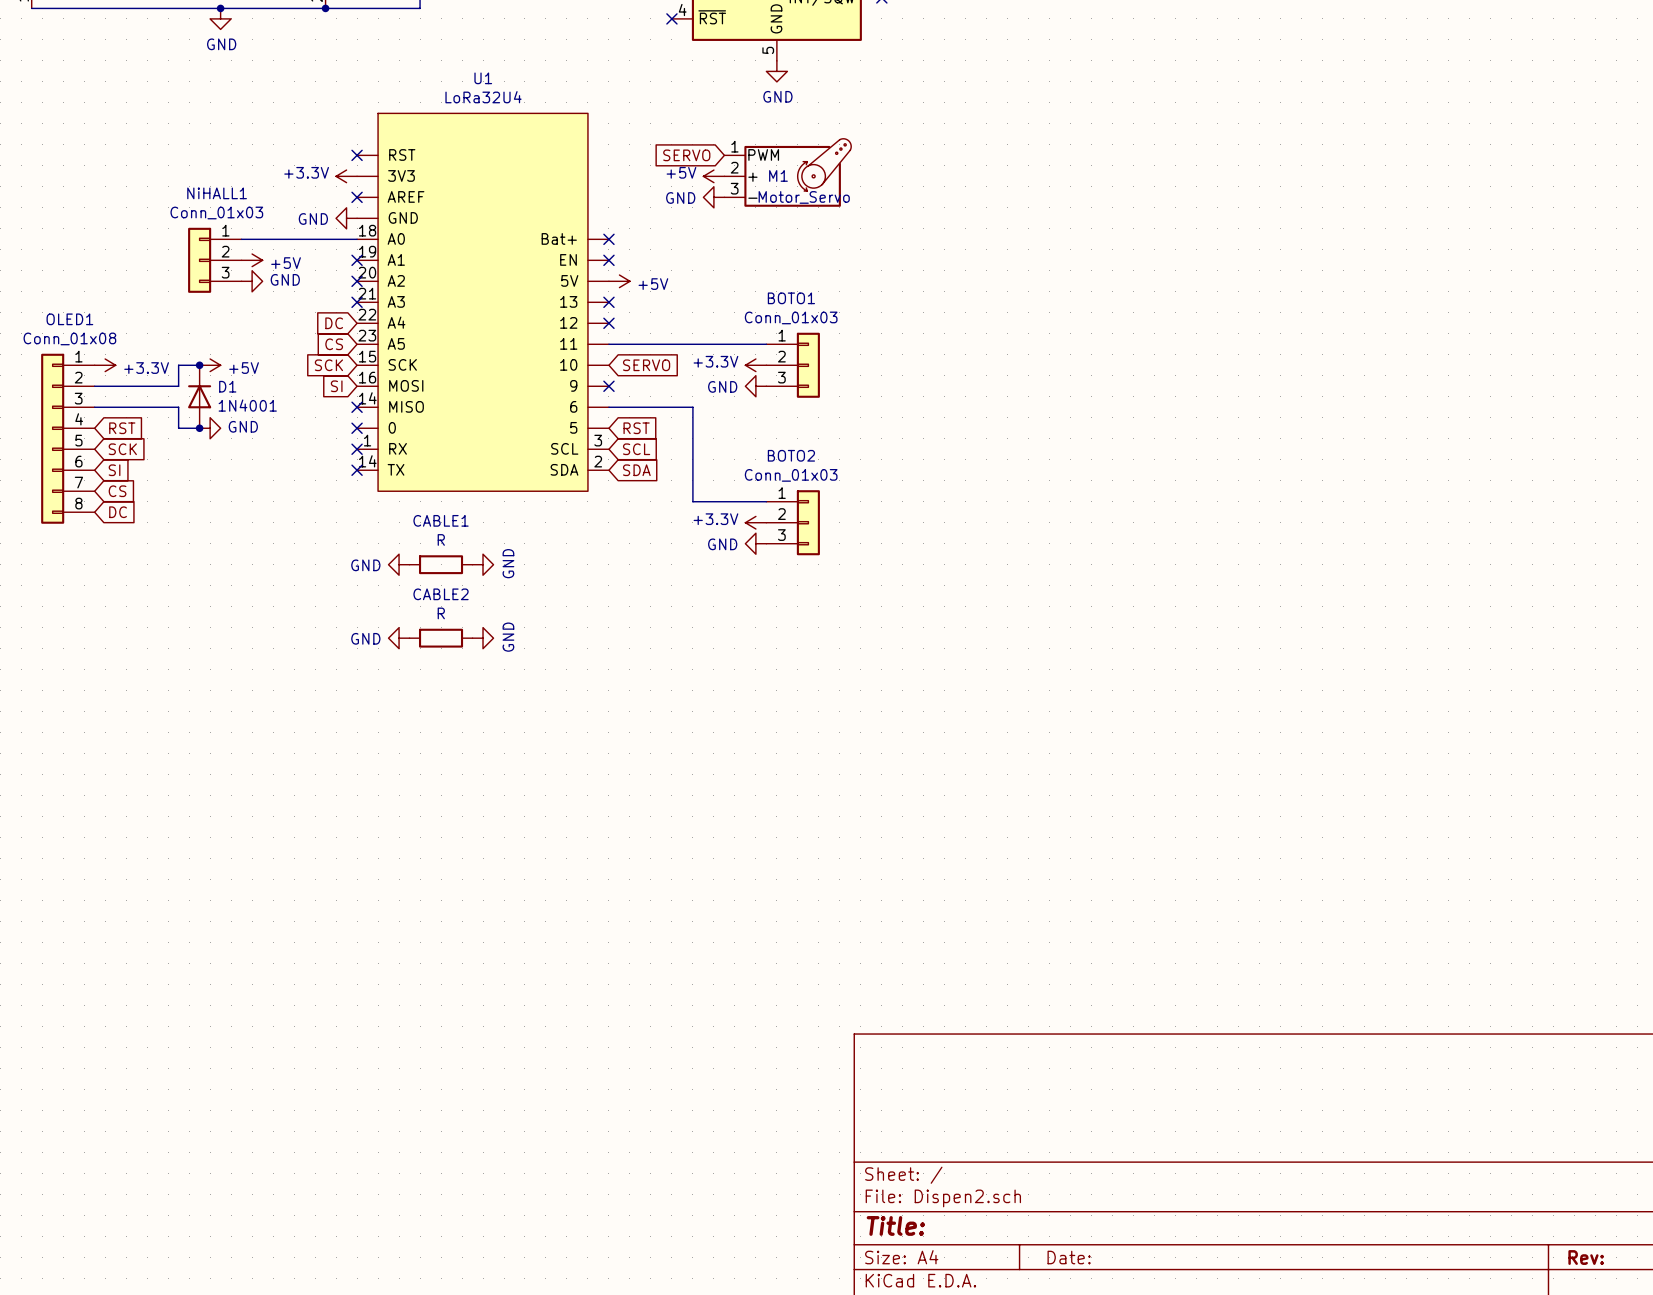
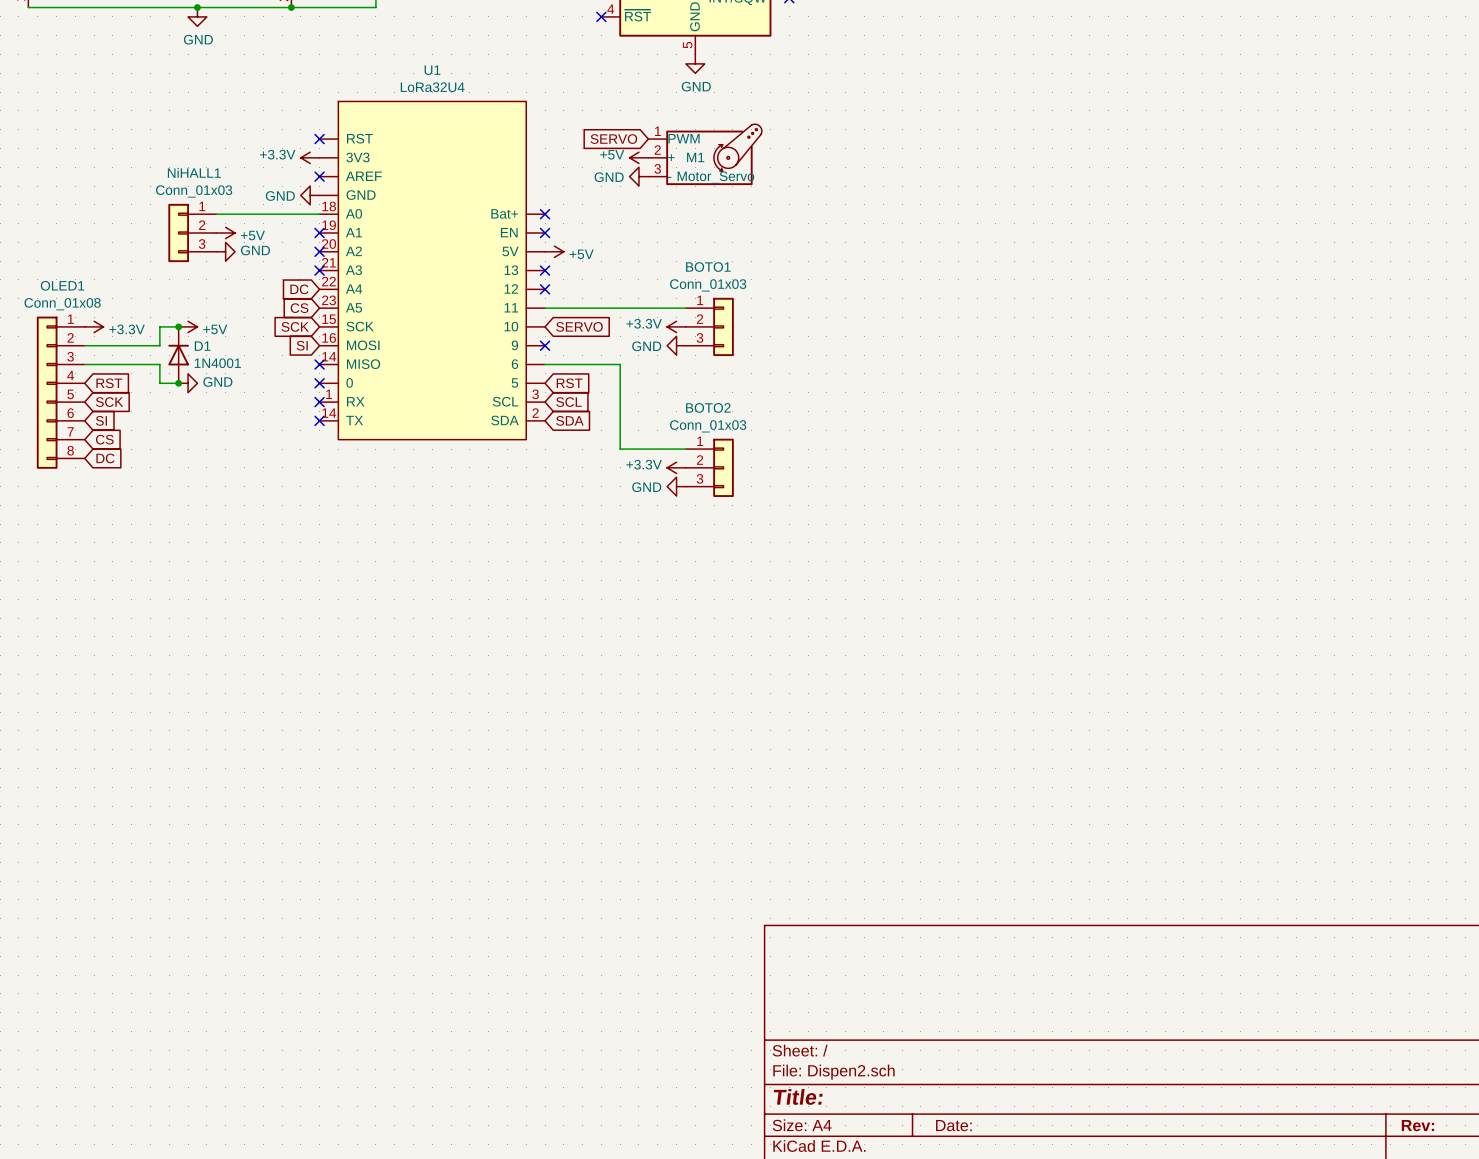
power symbol: GND (399, 564) -> none
CABLE1: R (441, 564) -> none
power symbol: GND (483, 564) -> none
power symbol: GND (399, 638) -> none
CABLE2: R (441, 638) -> none
power symbol: GND (483, 638) -> none

